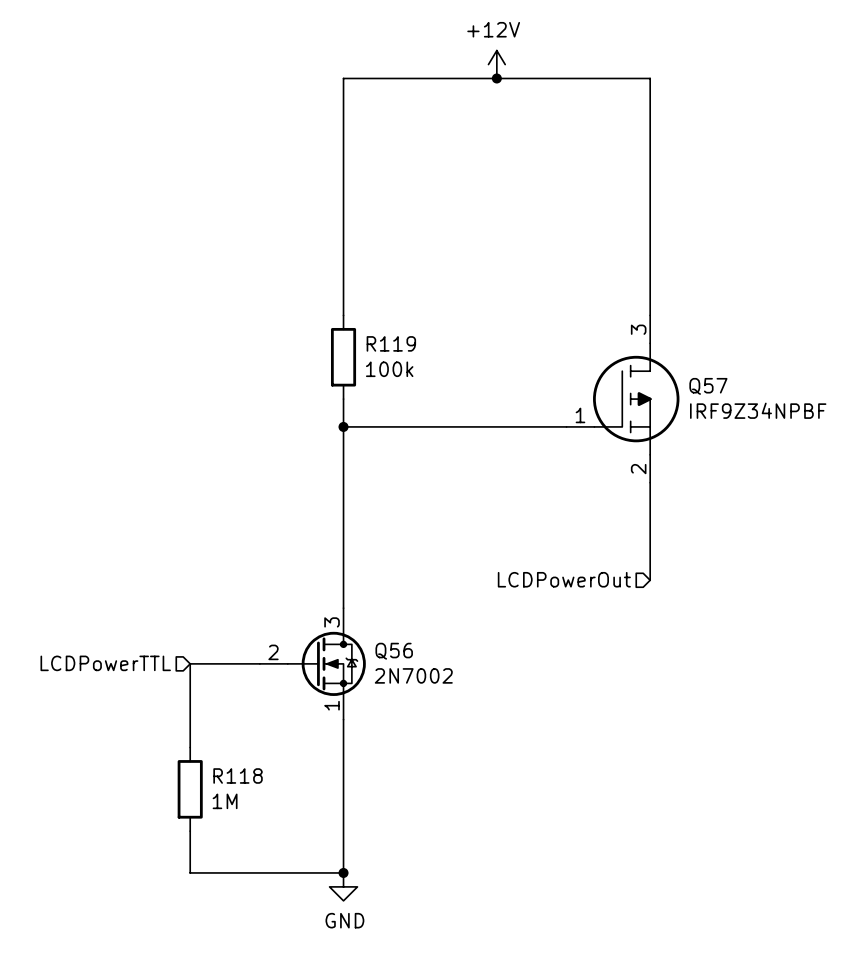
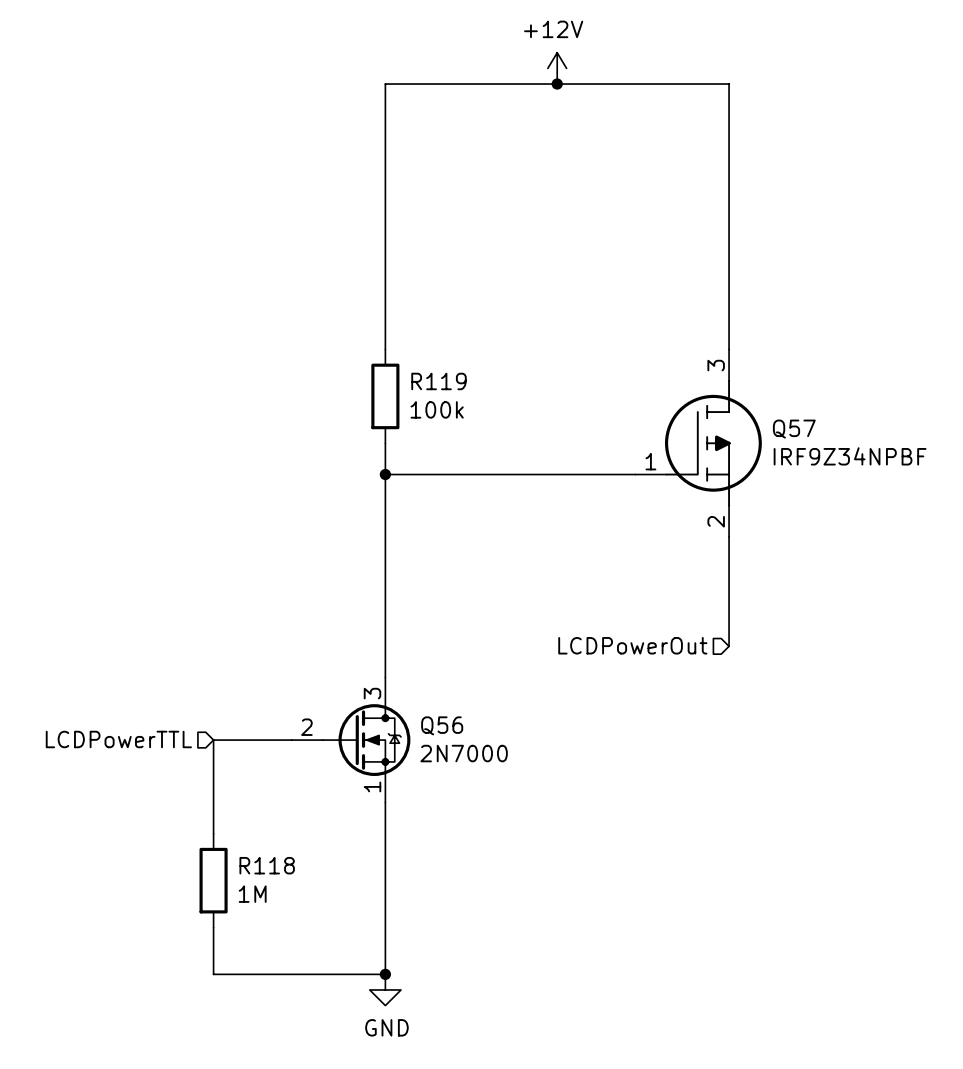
Q56 value: 2N7002 (413, 675) -> 2N7000 (464, 753)

